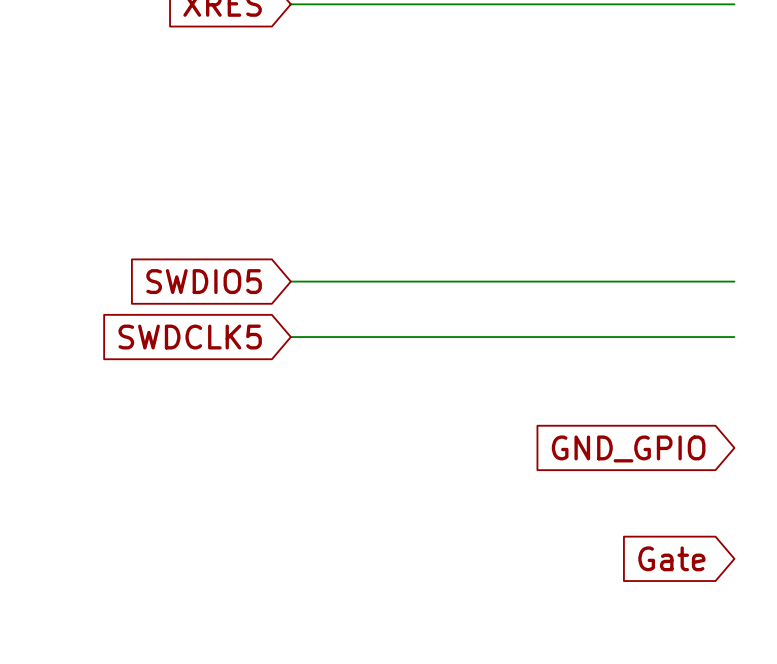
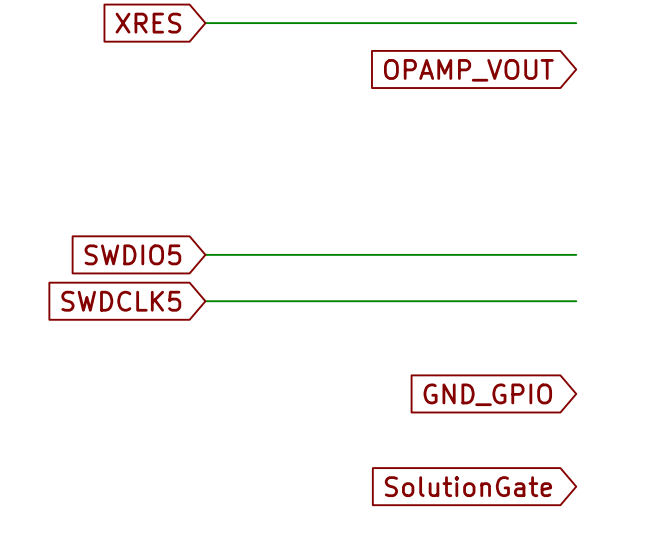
global label: none -> OPAMP_VOUT (468, 70)
global label: Gate (671, 558) -> SolutionGate (468, 486)

